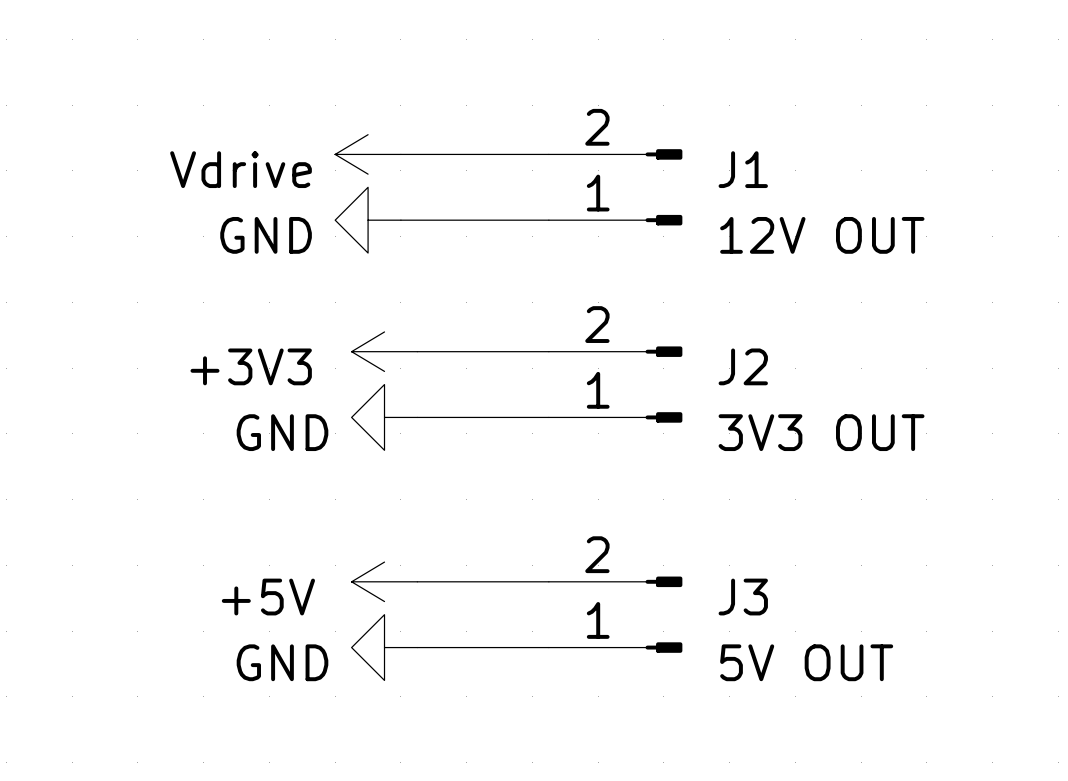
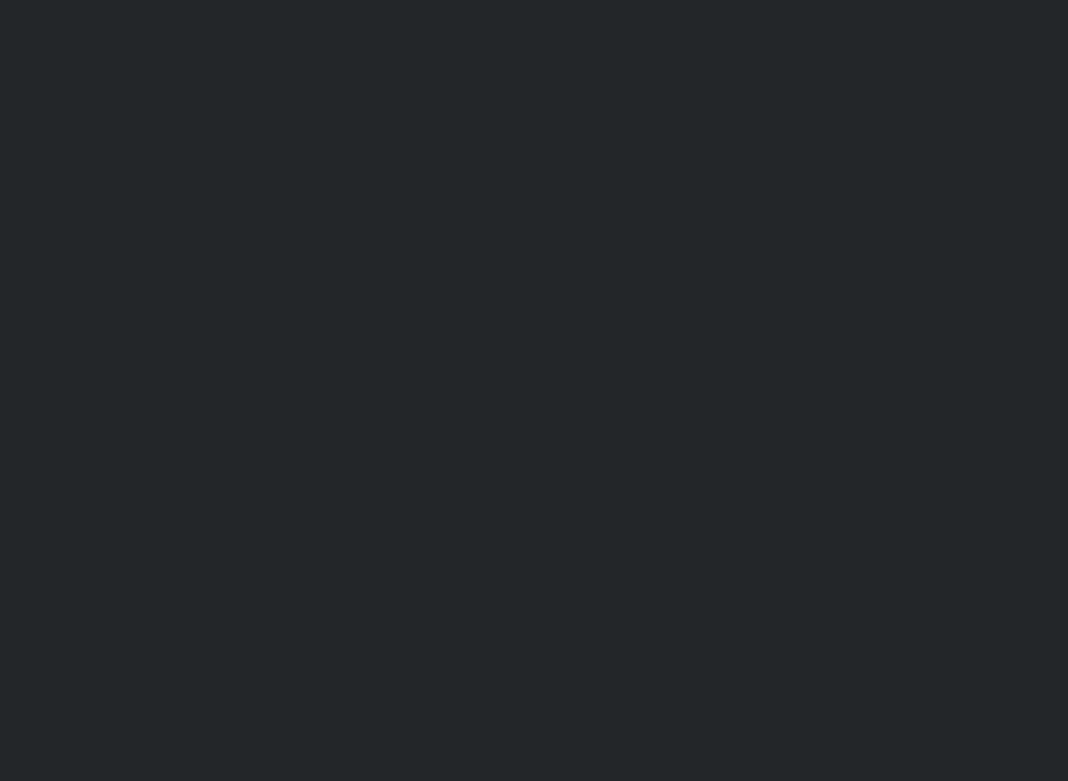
power symbol: Vdrive (368, 154) -> none
wire: (400, 154) (548, 154) -> none
J1: 12V OUT (615, 187) -> none
power symbol: GND (368, 220) -> none
wire: (400, 220) (548, 220) -> none
power symbol: +3V3 (384, 351) -> none
wire: (417, 351) (548, 351) -> none
J2: 3V3 OUT (615, 384) -> none
power symbol: GND (384, 417) -> none
wire: (417, 417) (548, 417) -> none
power symbol: +5V (384, 581) -> none
wire: (417, 581) (548, 581) -> none
J3: 5V OUT (615, 614) -> none
power symbol: GND (384, 647) -> none
wire: (417, 647) (548, 647) -> none

